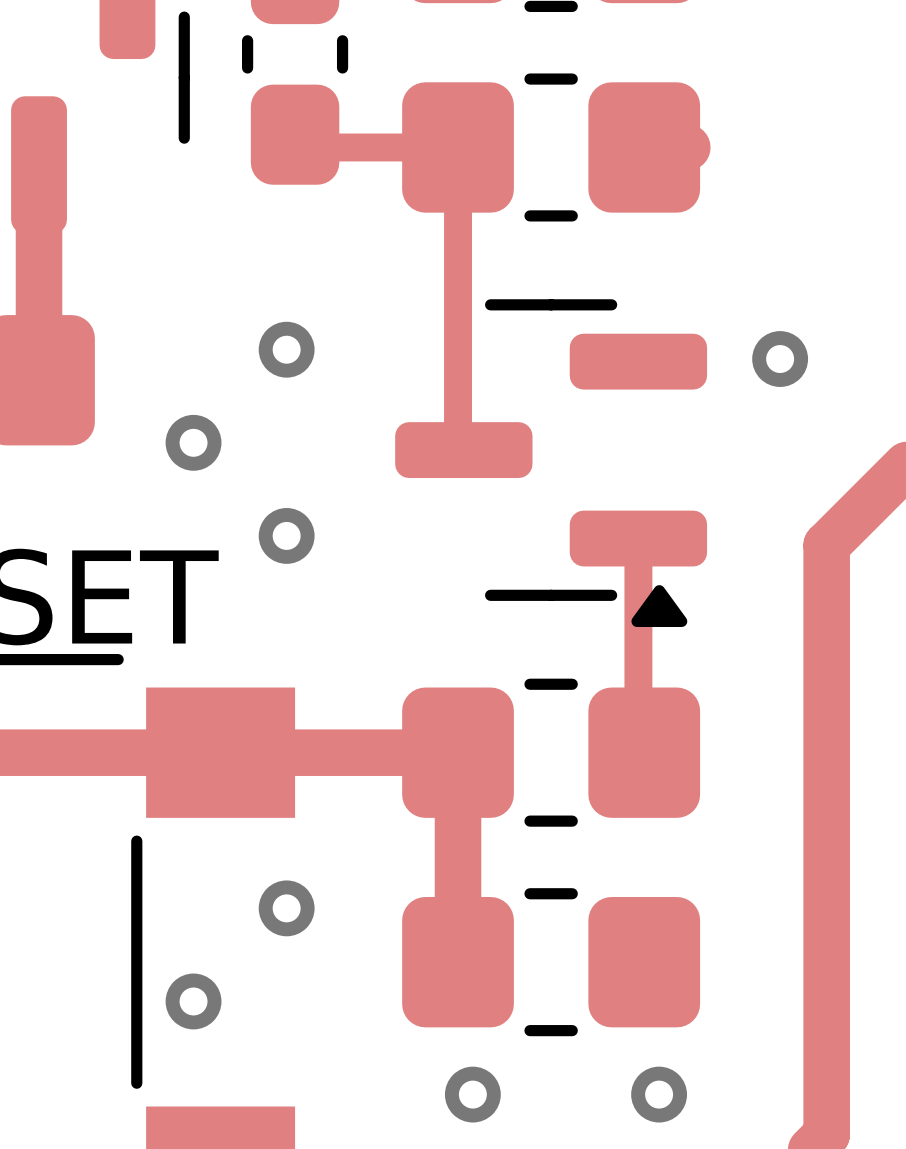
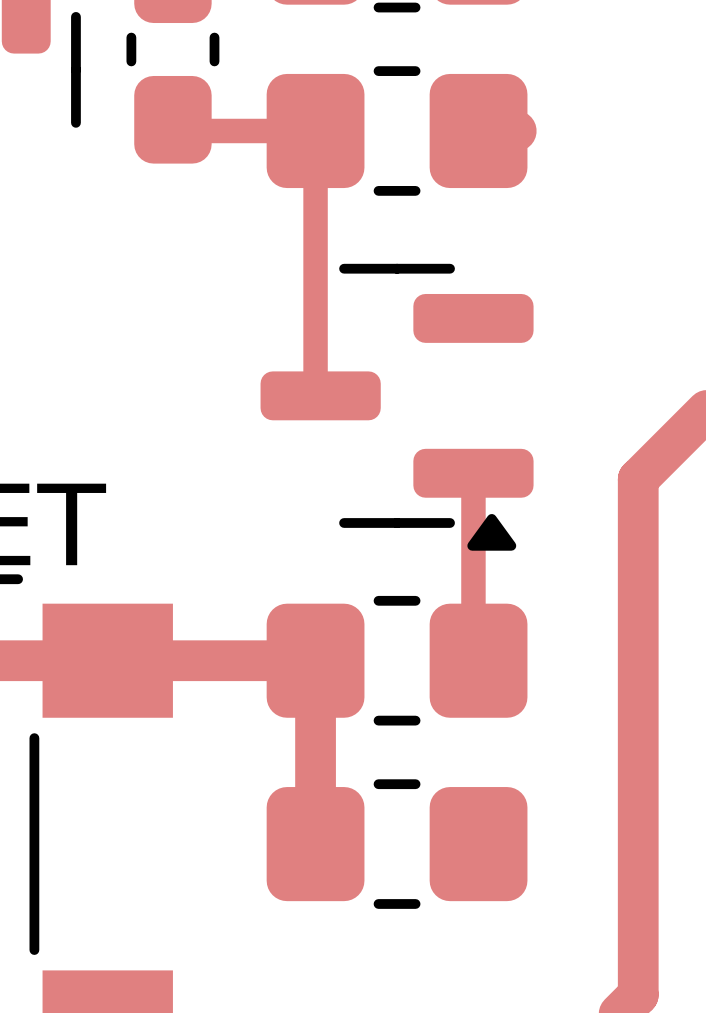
via: (286, 349) -> none
via: (780, 359) -> none
via: (193, 442) -> none
via: (286, 535) -> none
via: (286, 908) -> none
via: (193, 1001) -> none
via: (472, 1094) -> none
via: (659, 1094) -> none

